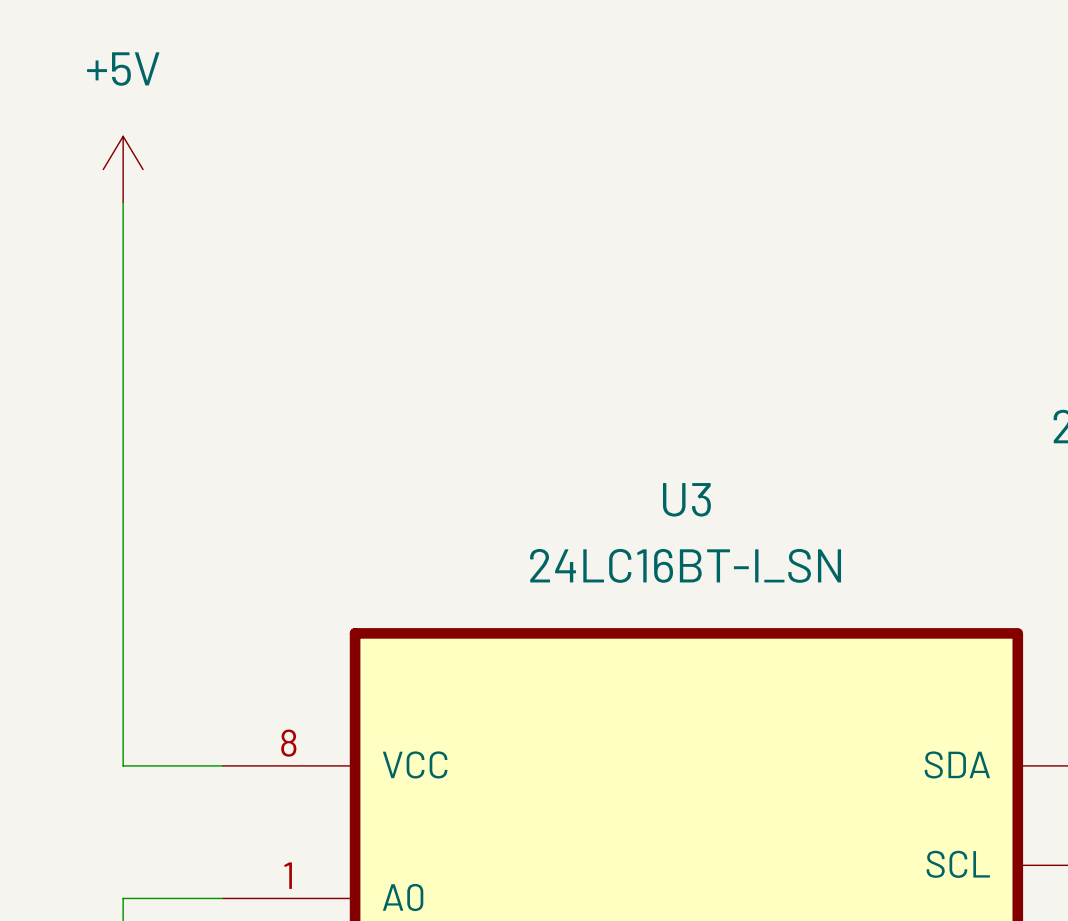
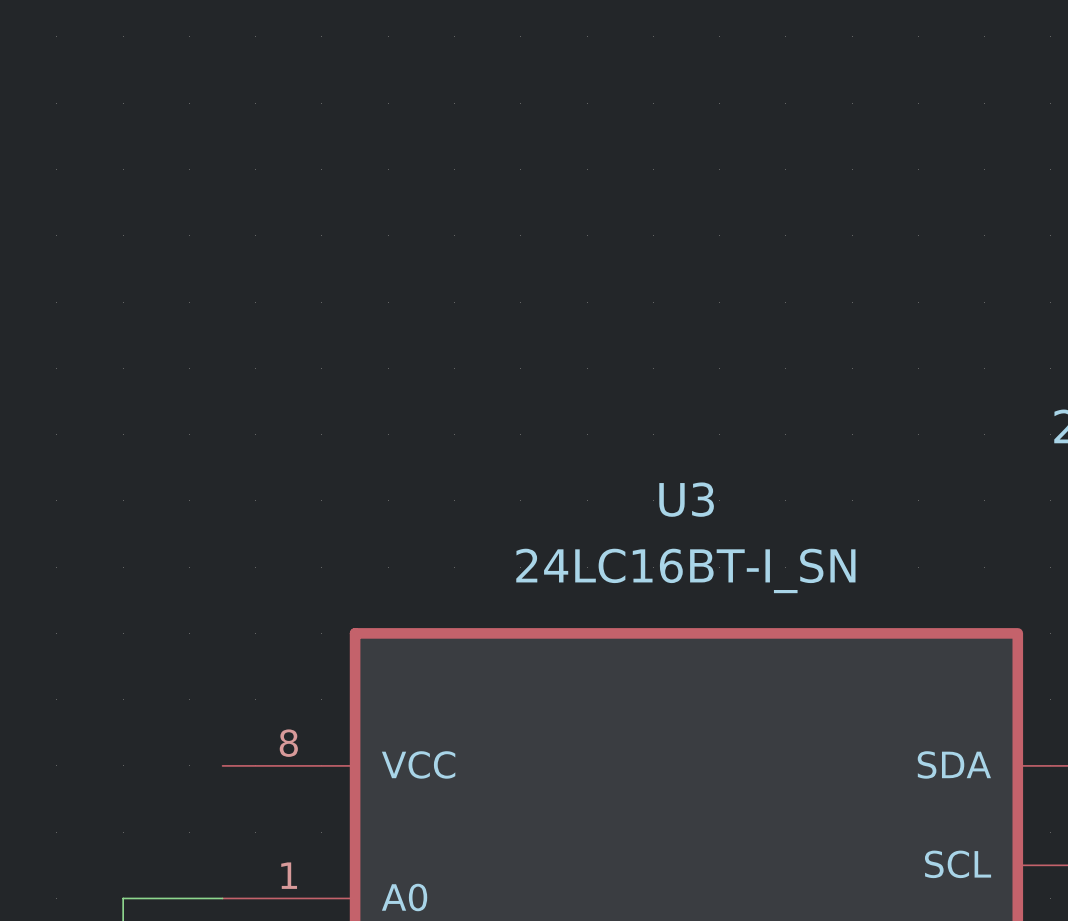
power symbol: +5V (123, 169) -> none
wire: (123, 202) (123, 765) (222, 765) -> none

